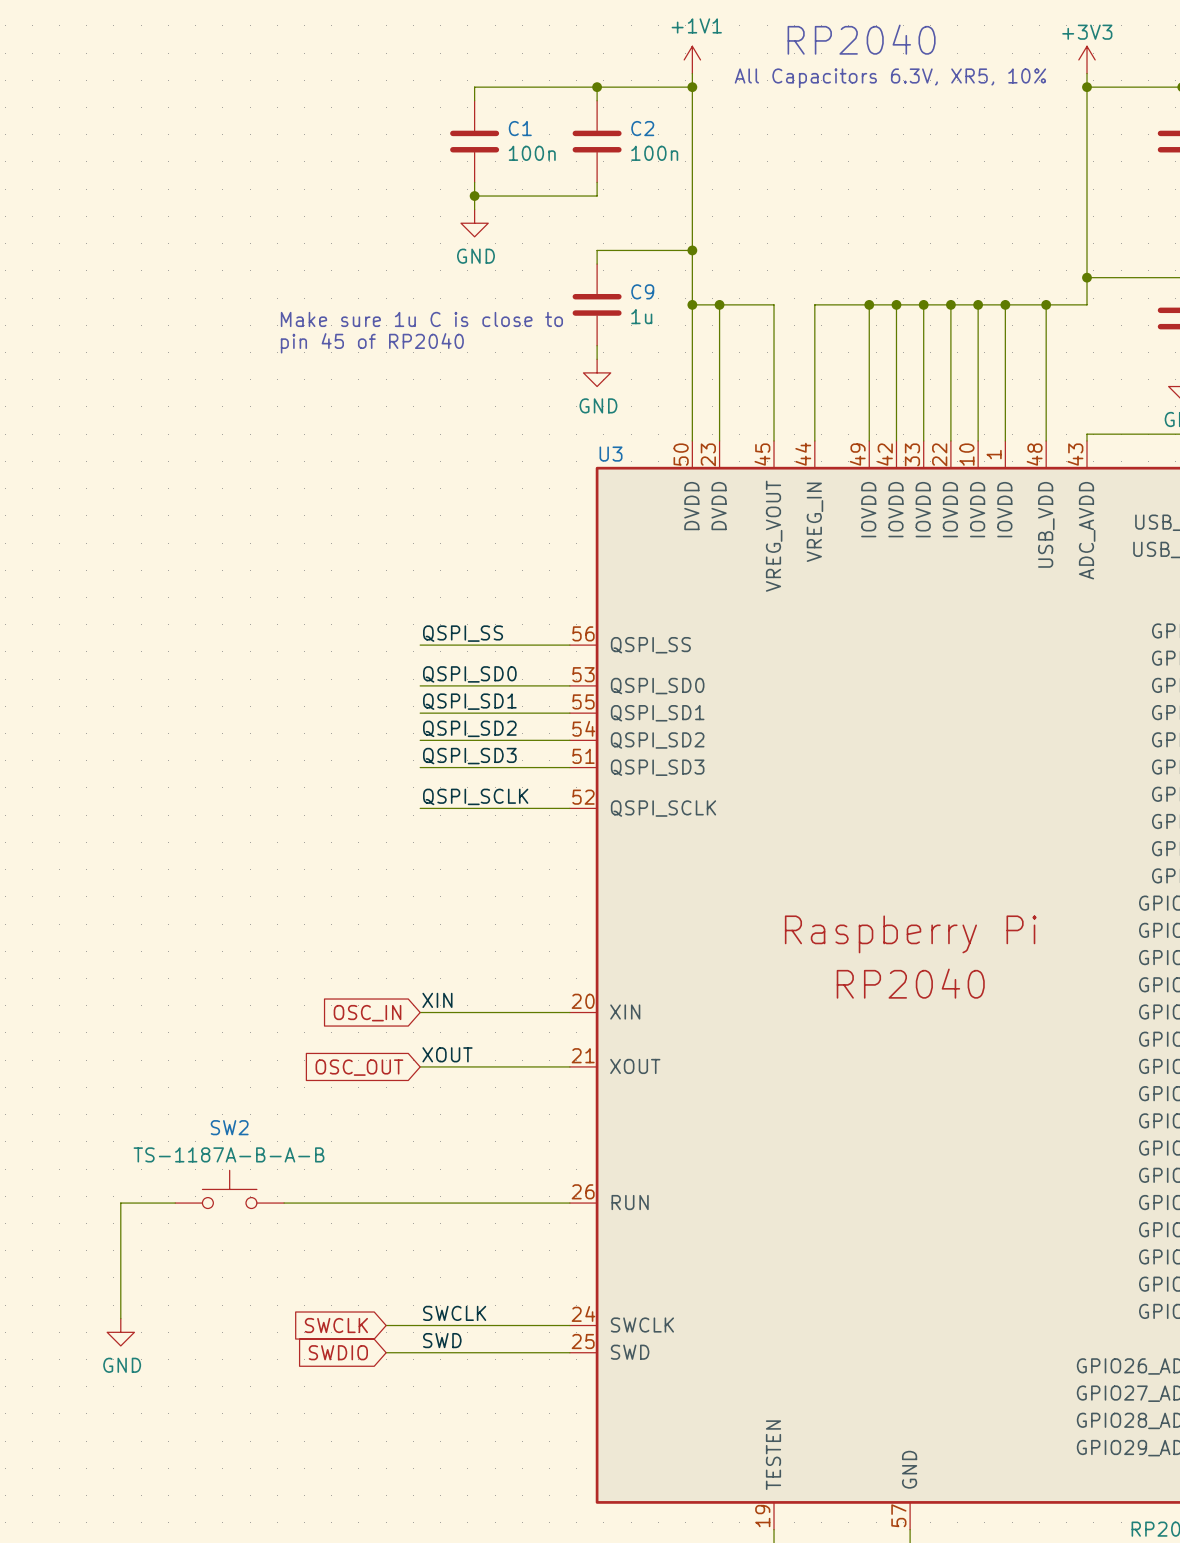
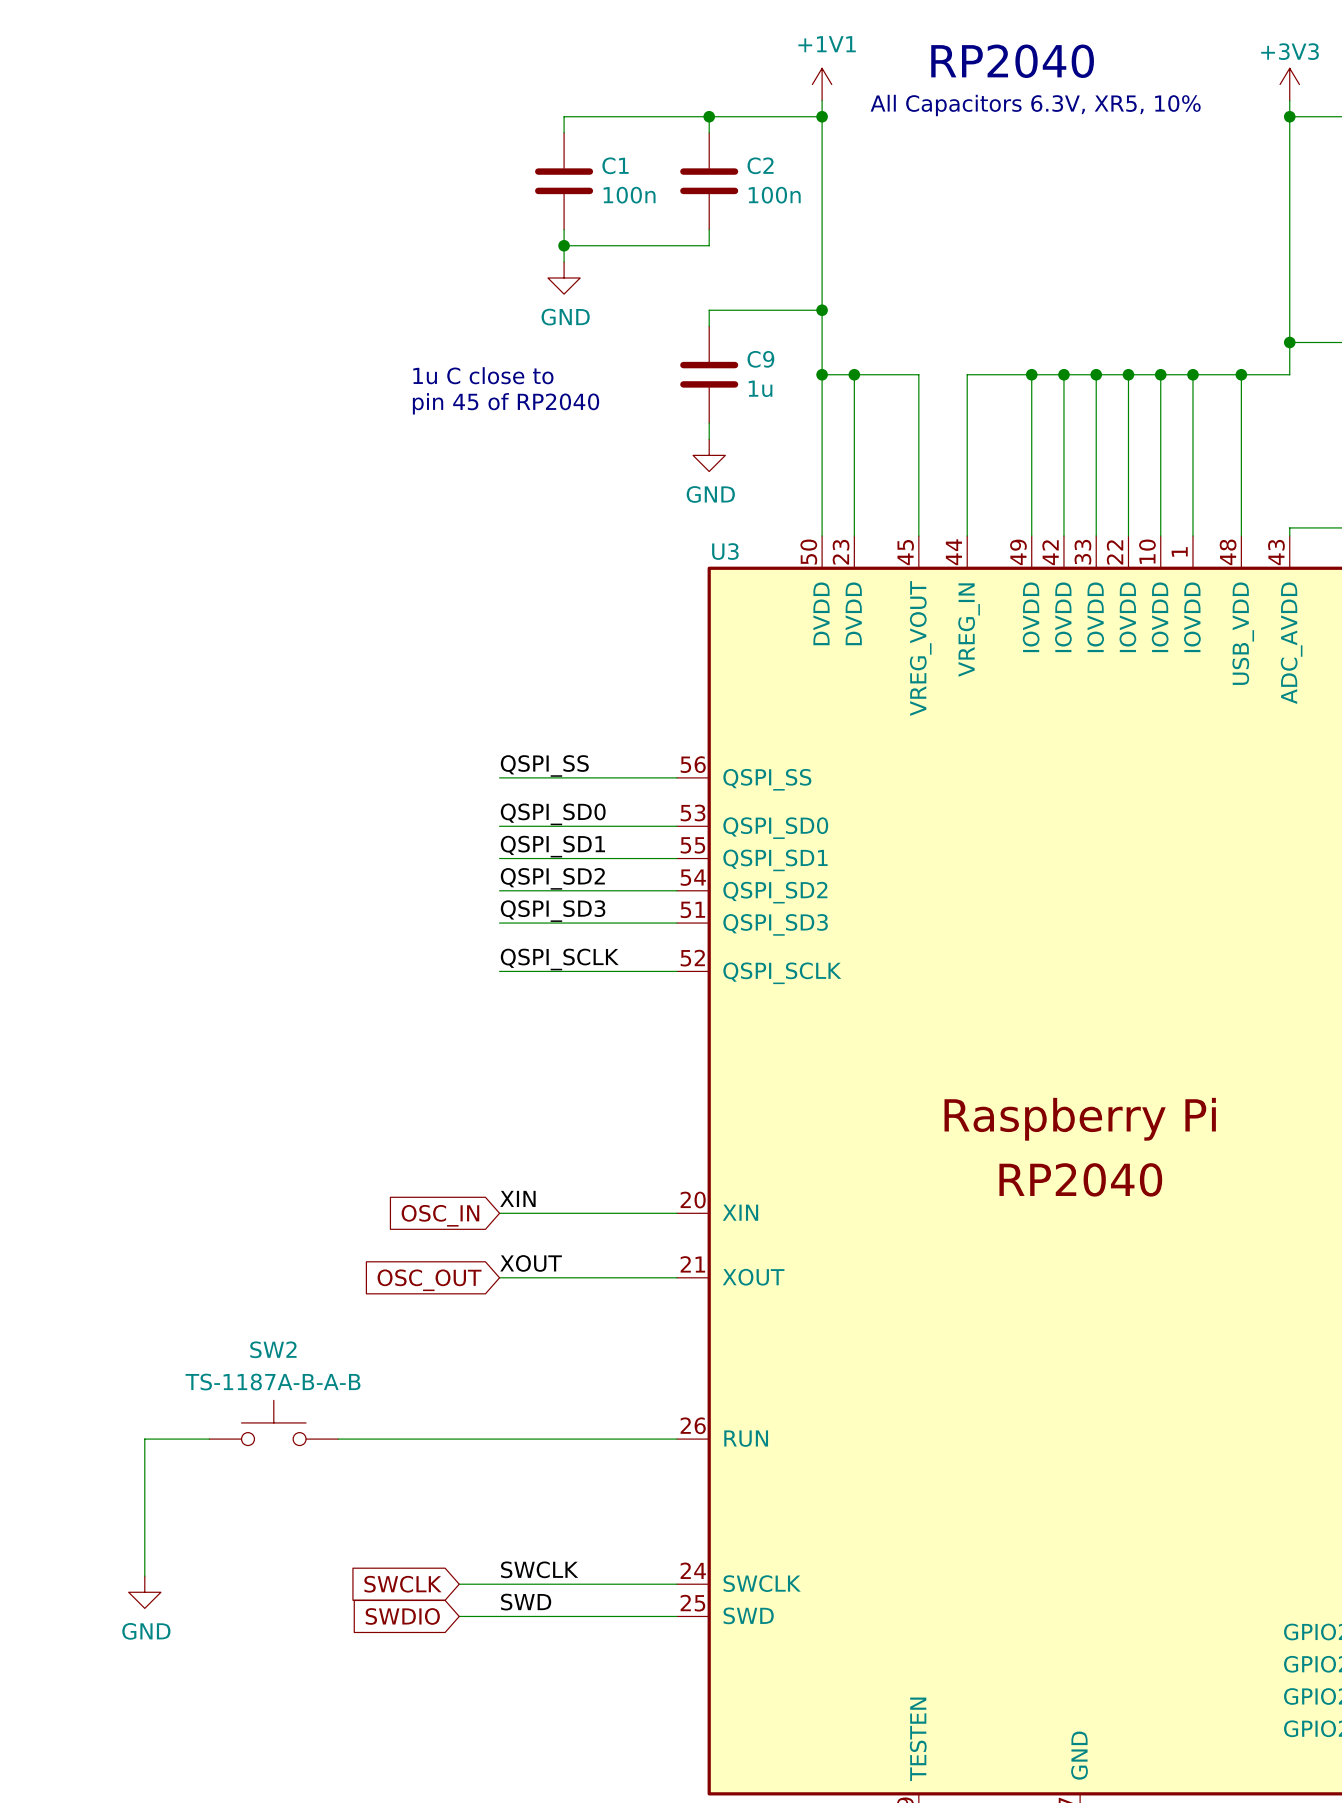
text: Make sure 1u C is close to (421, 319) -> 1u C close to (483, 375)
text position: pin 45 of RP2040 (372, 343) -> pin 45 of RP2040 (506, 403)

